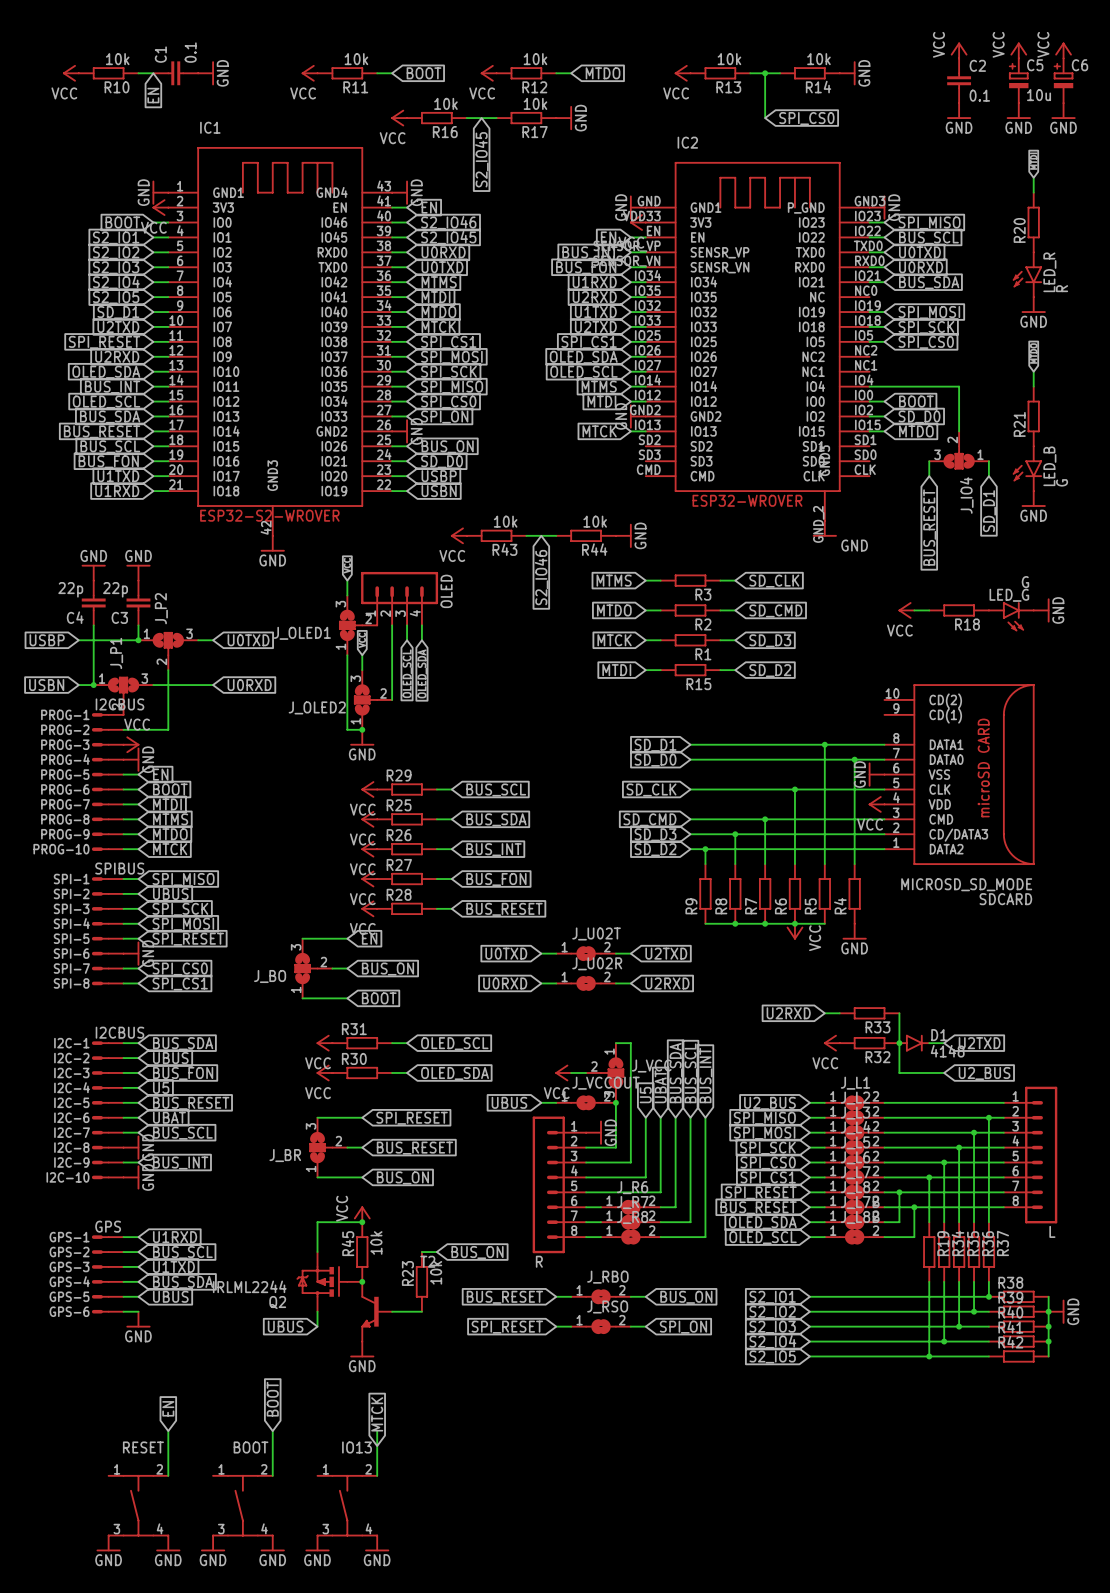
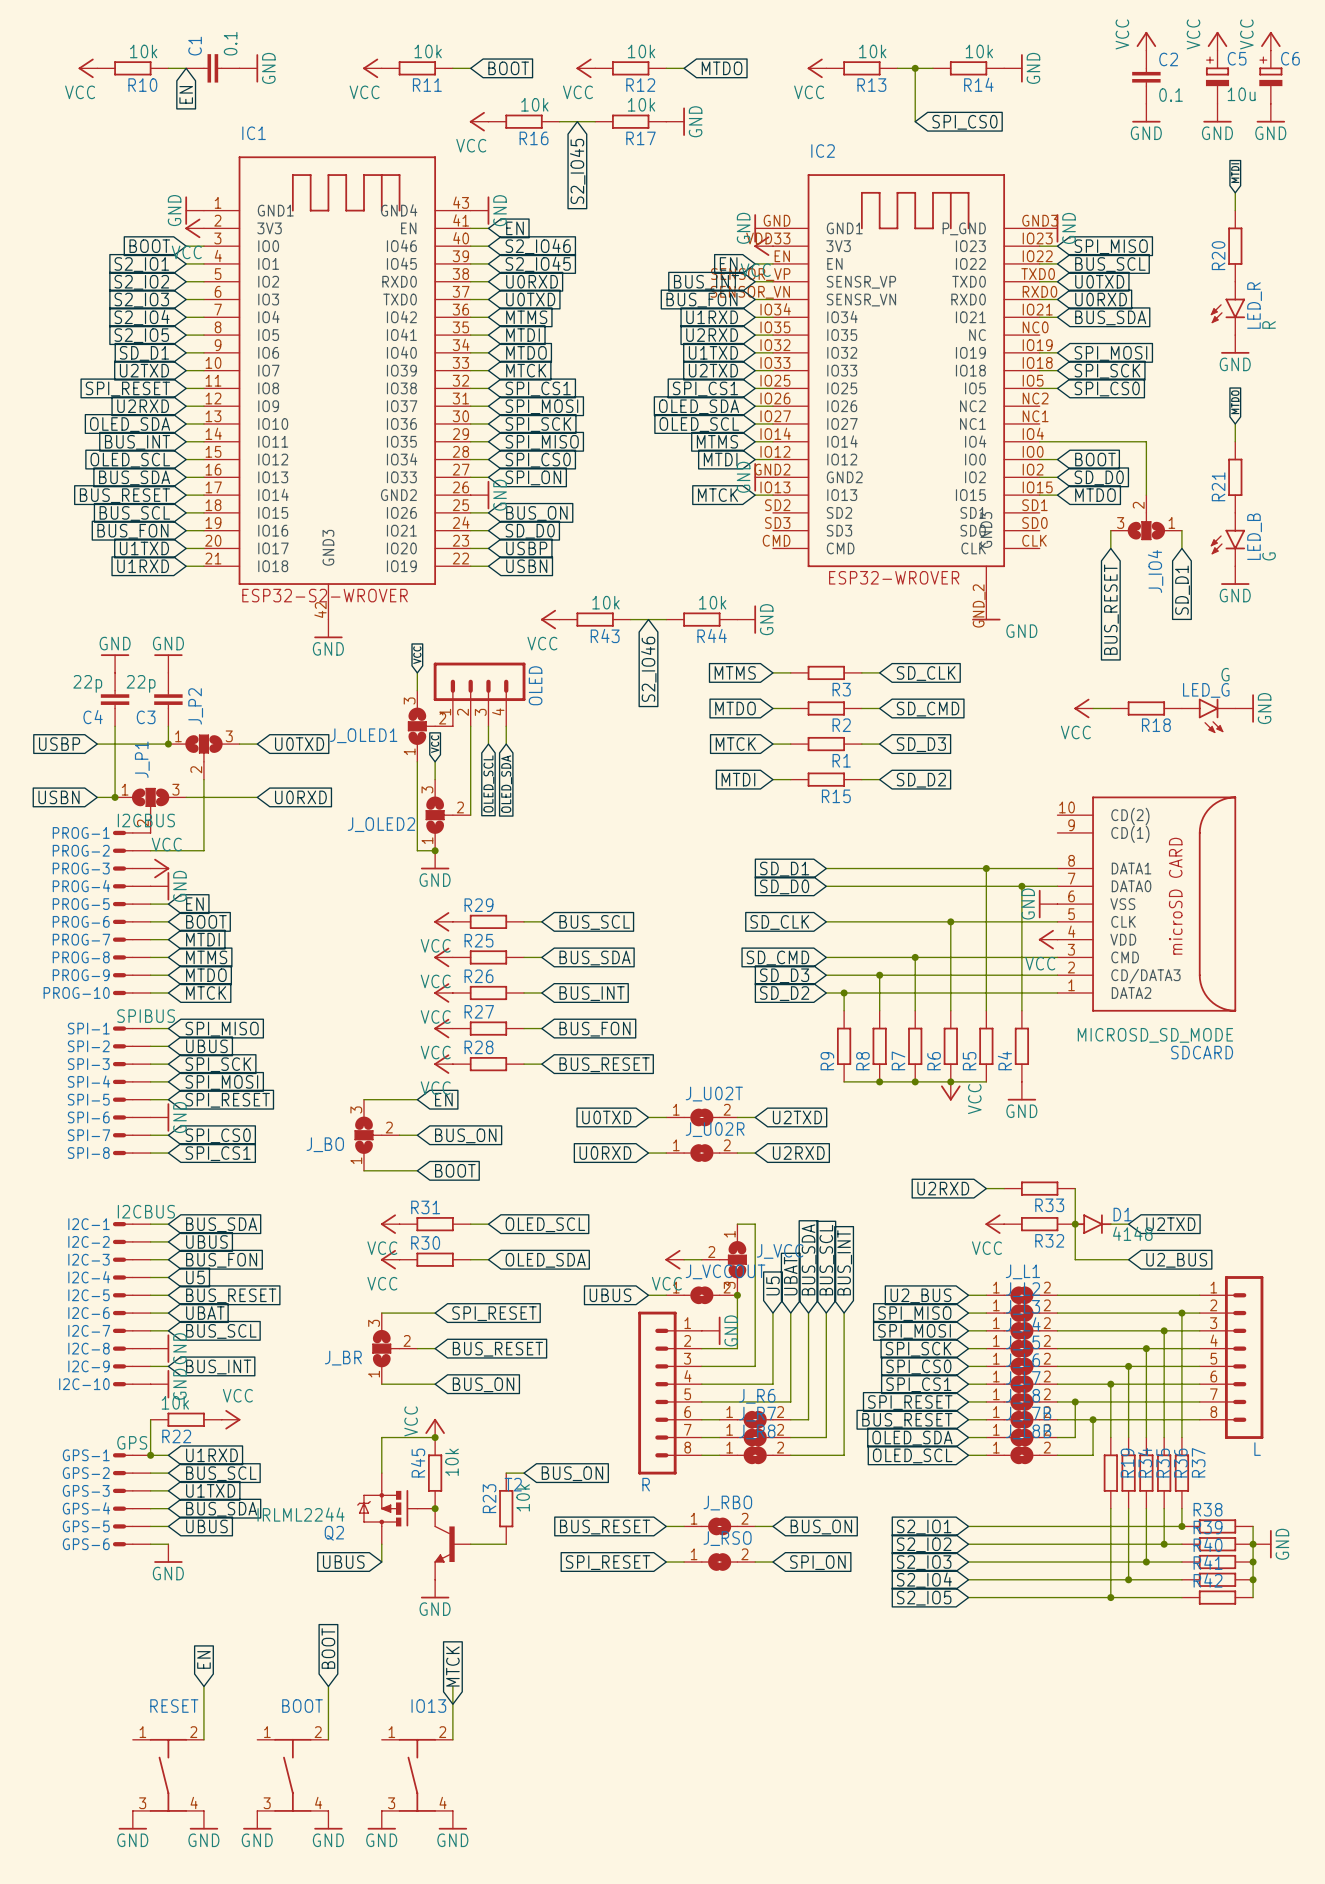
wire: none -> (150, 1419) (150, 1455)
R22: none -> 10k (186, 1419)
power symbol: none -> VCC (231, 1419)
junction: none -> (150, 1455)

